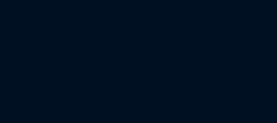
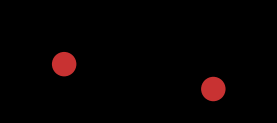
part: none -> (64, 64)
part: none -> (213, 89)

